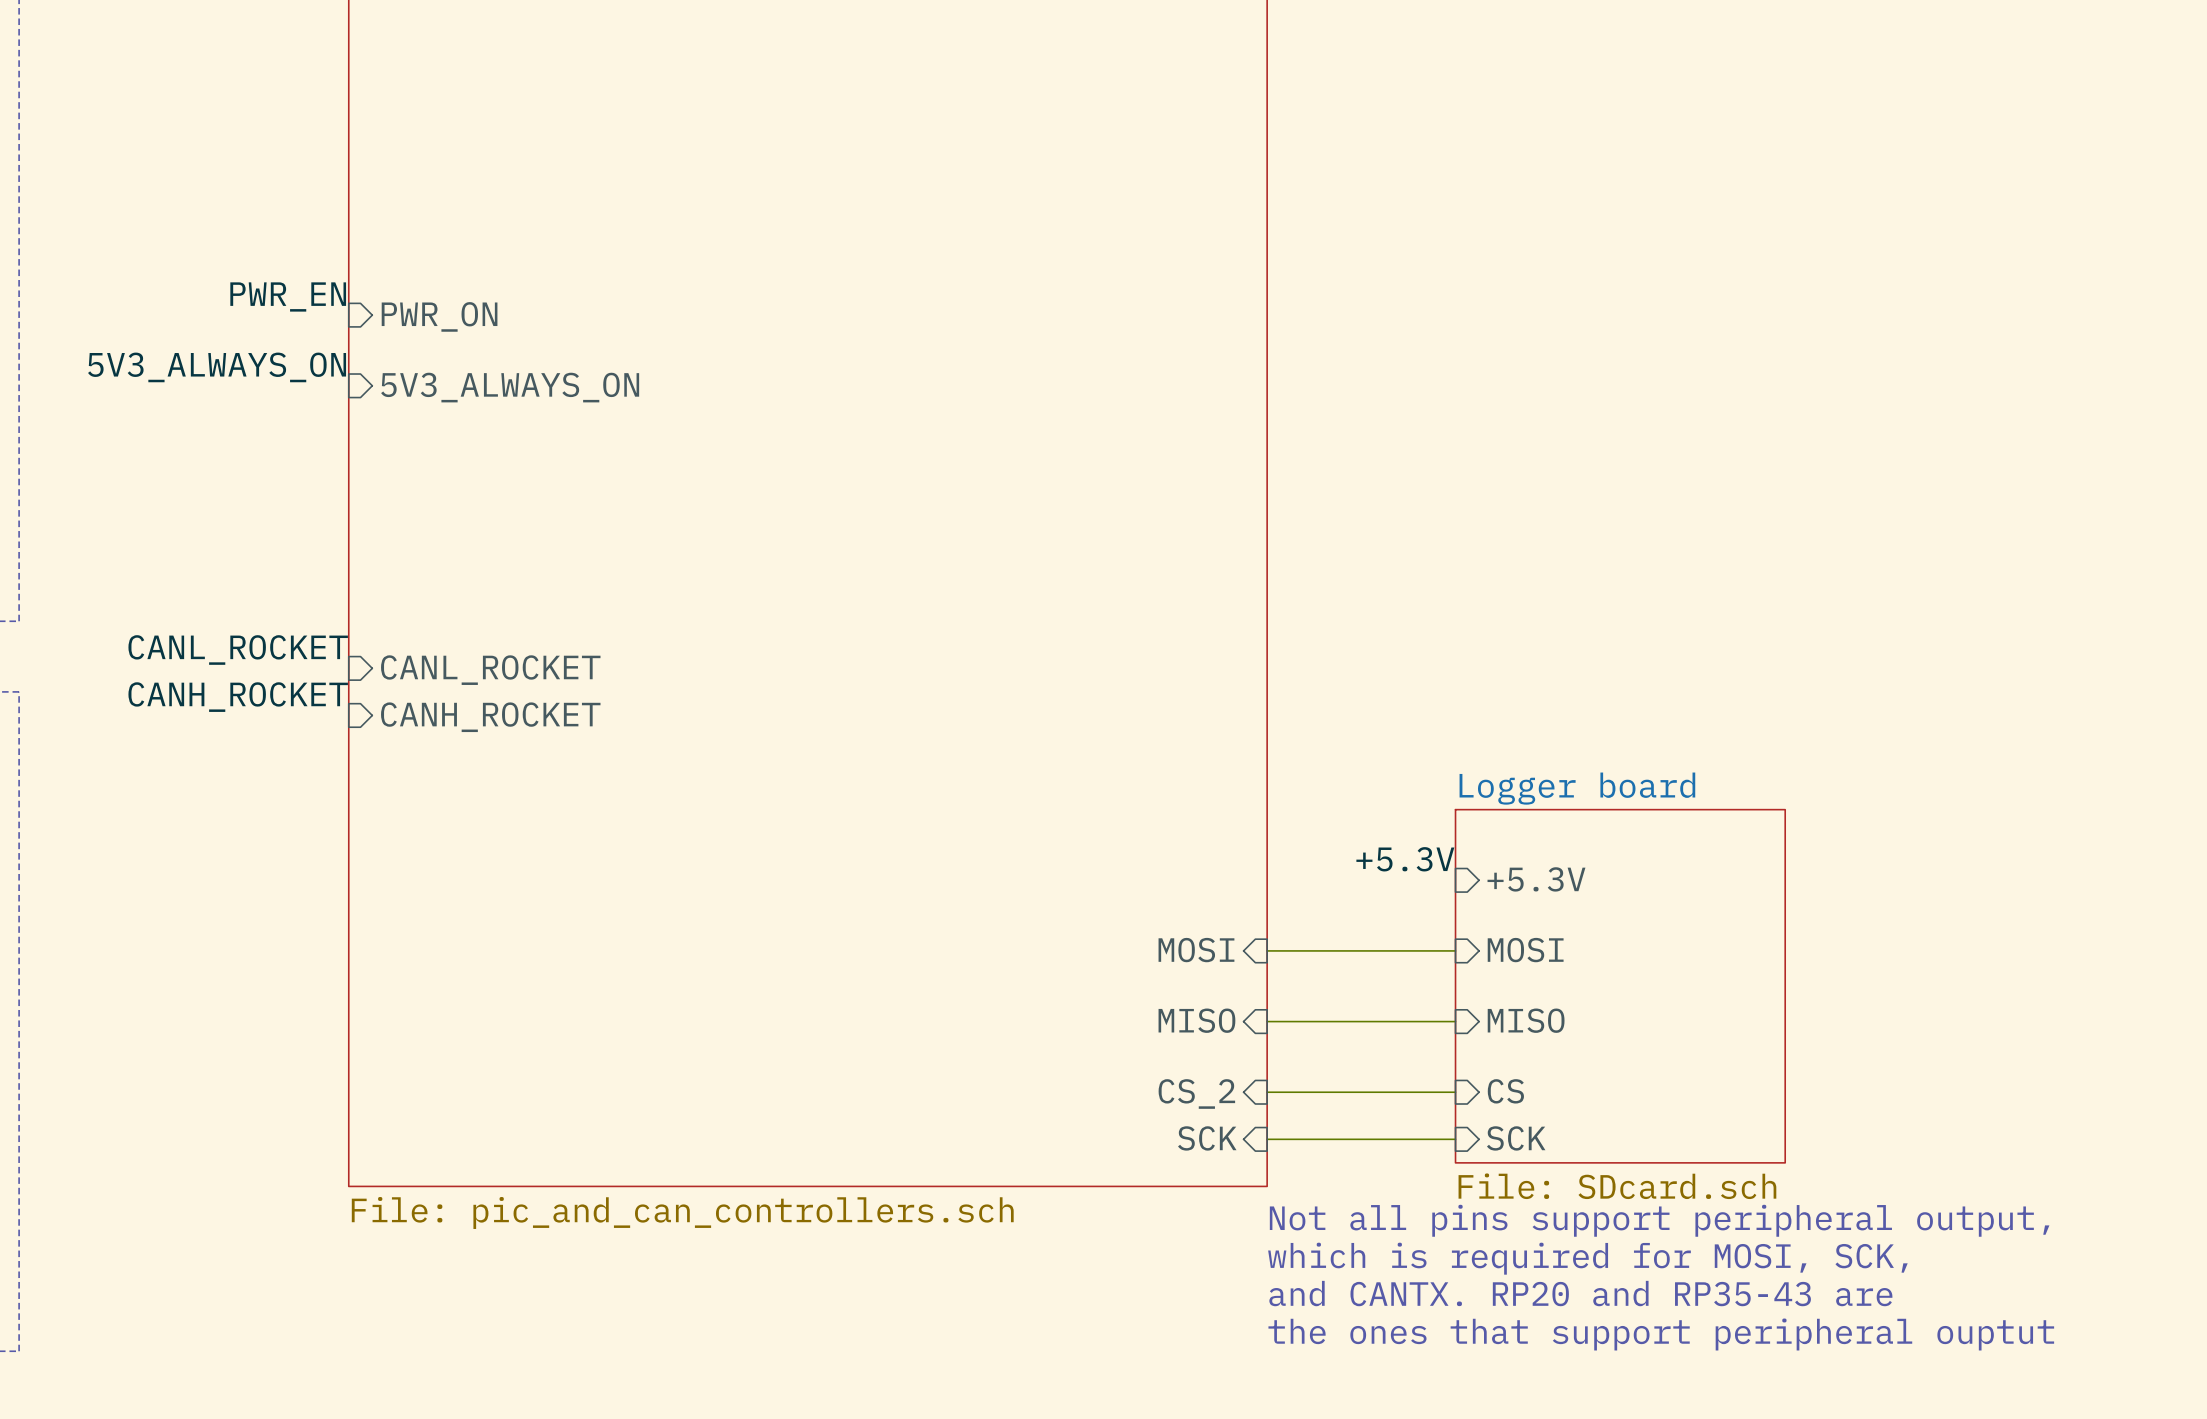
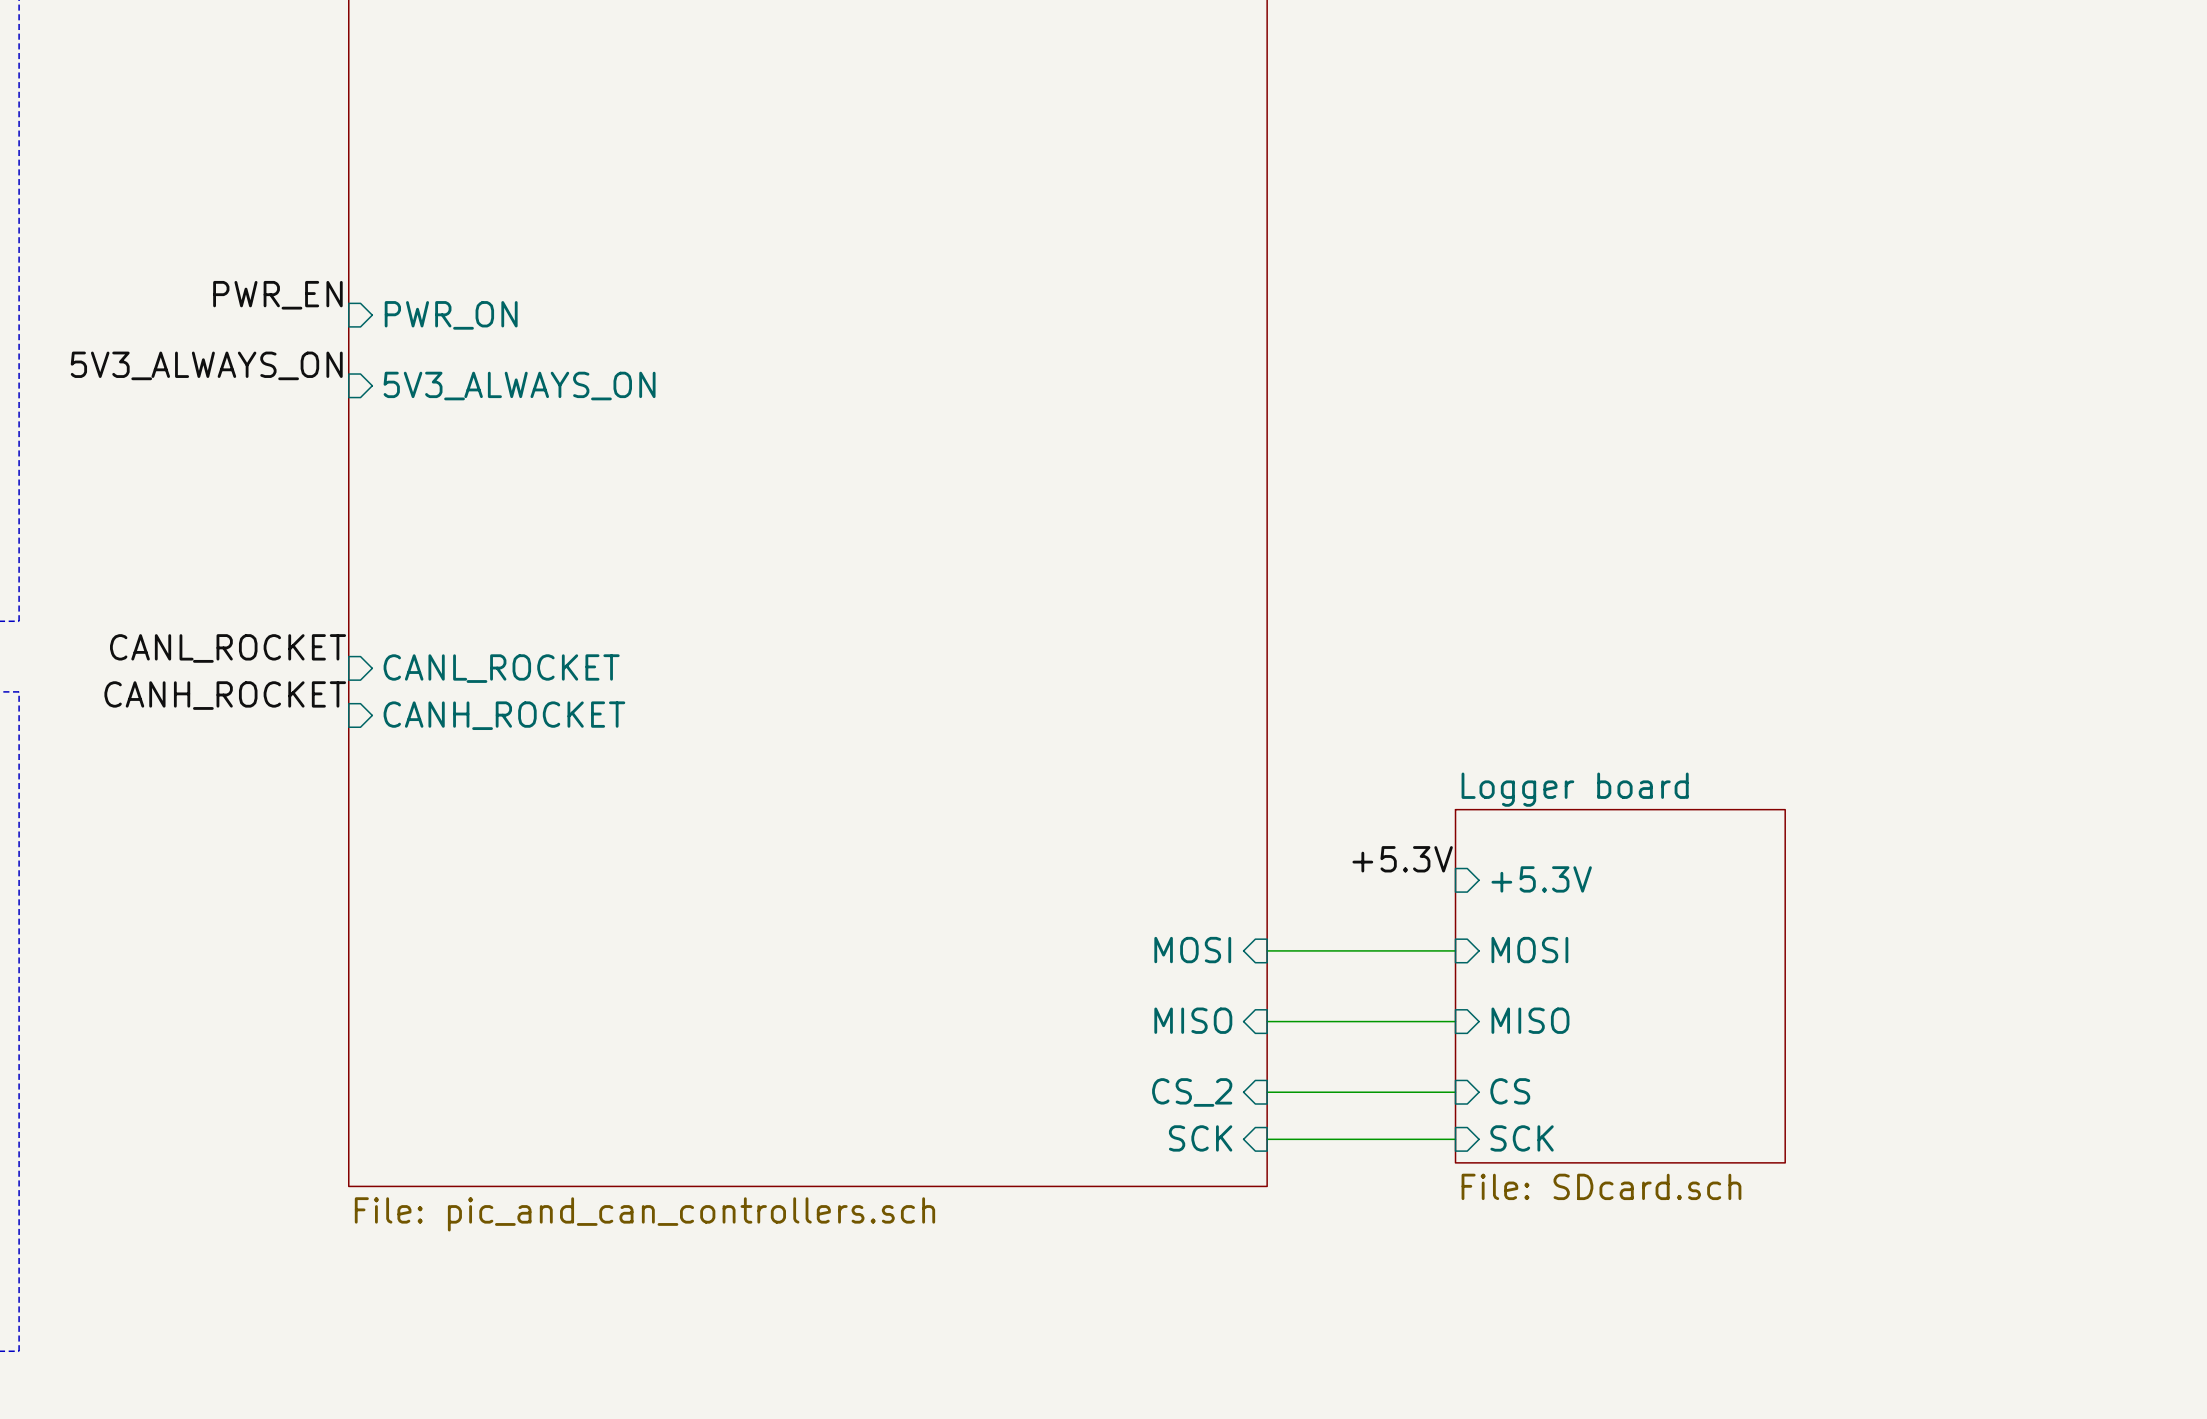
text: Not all pins support peripheral output, (1659, 1220) -> none
text: which is required for MOSI, SCK, (1587, 1258) -> none
text: and CANTX. RP20 and RP35-43 are (1580, 1293) -> none
text: the ones that support peripheral ouptut (1661, 1334) -> none

